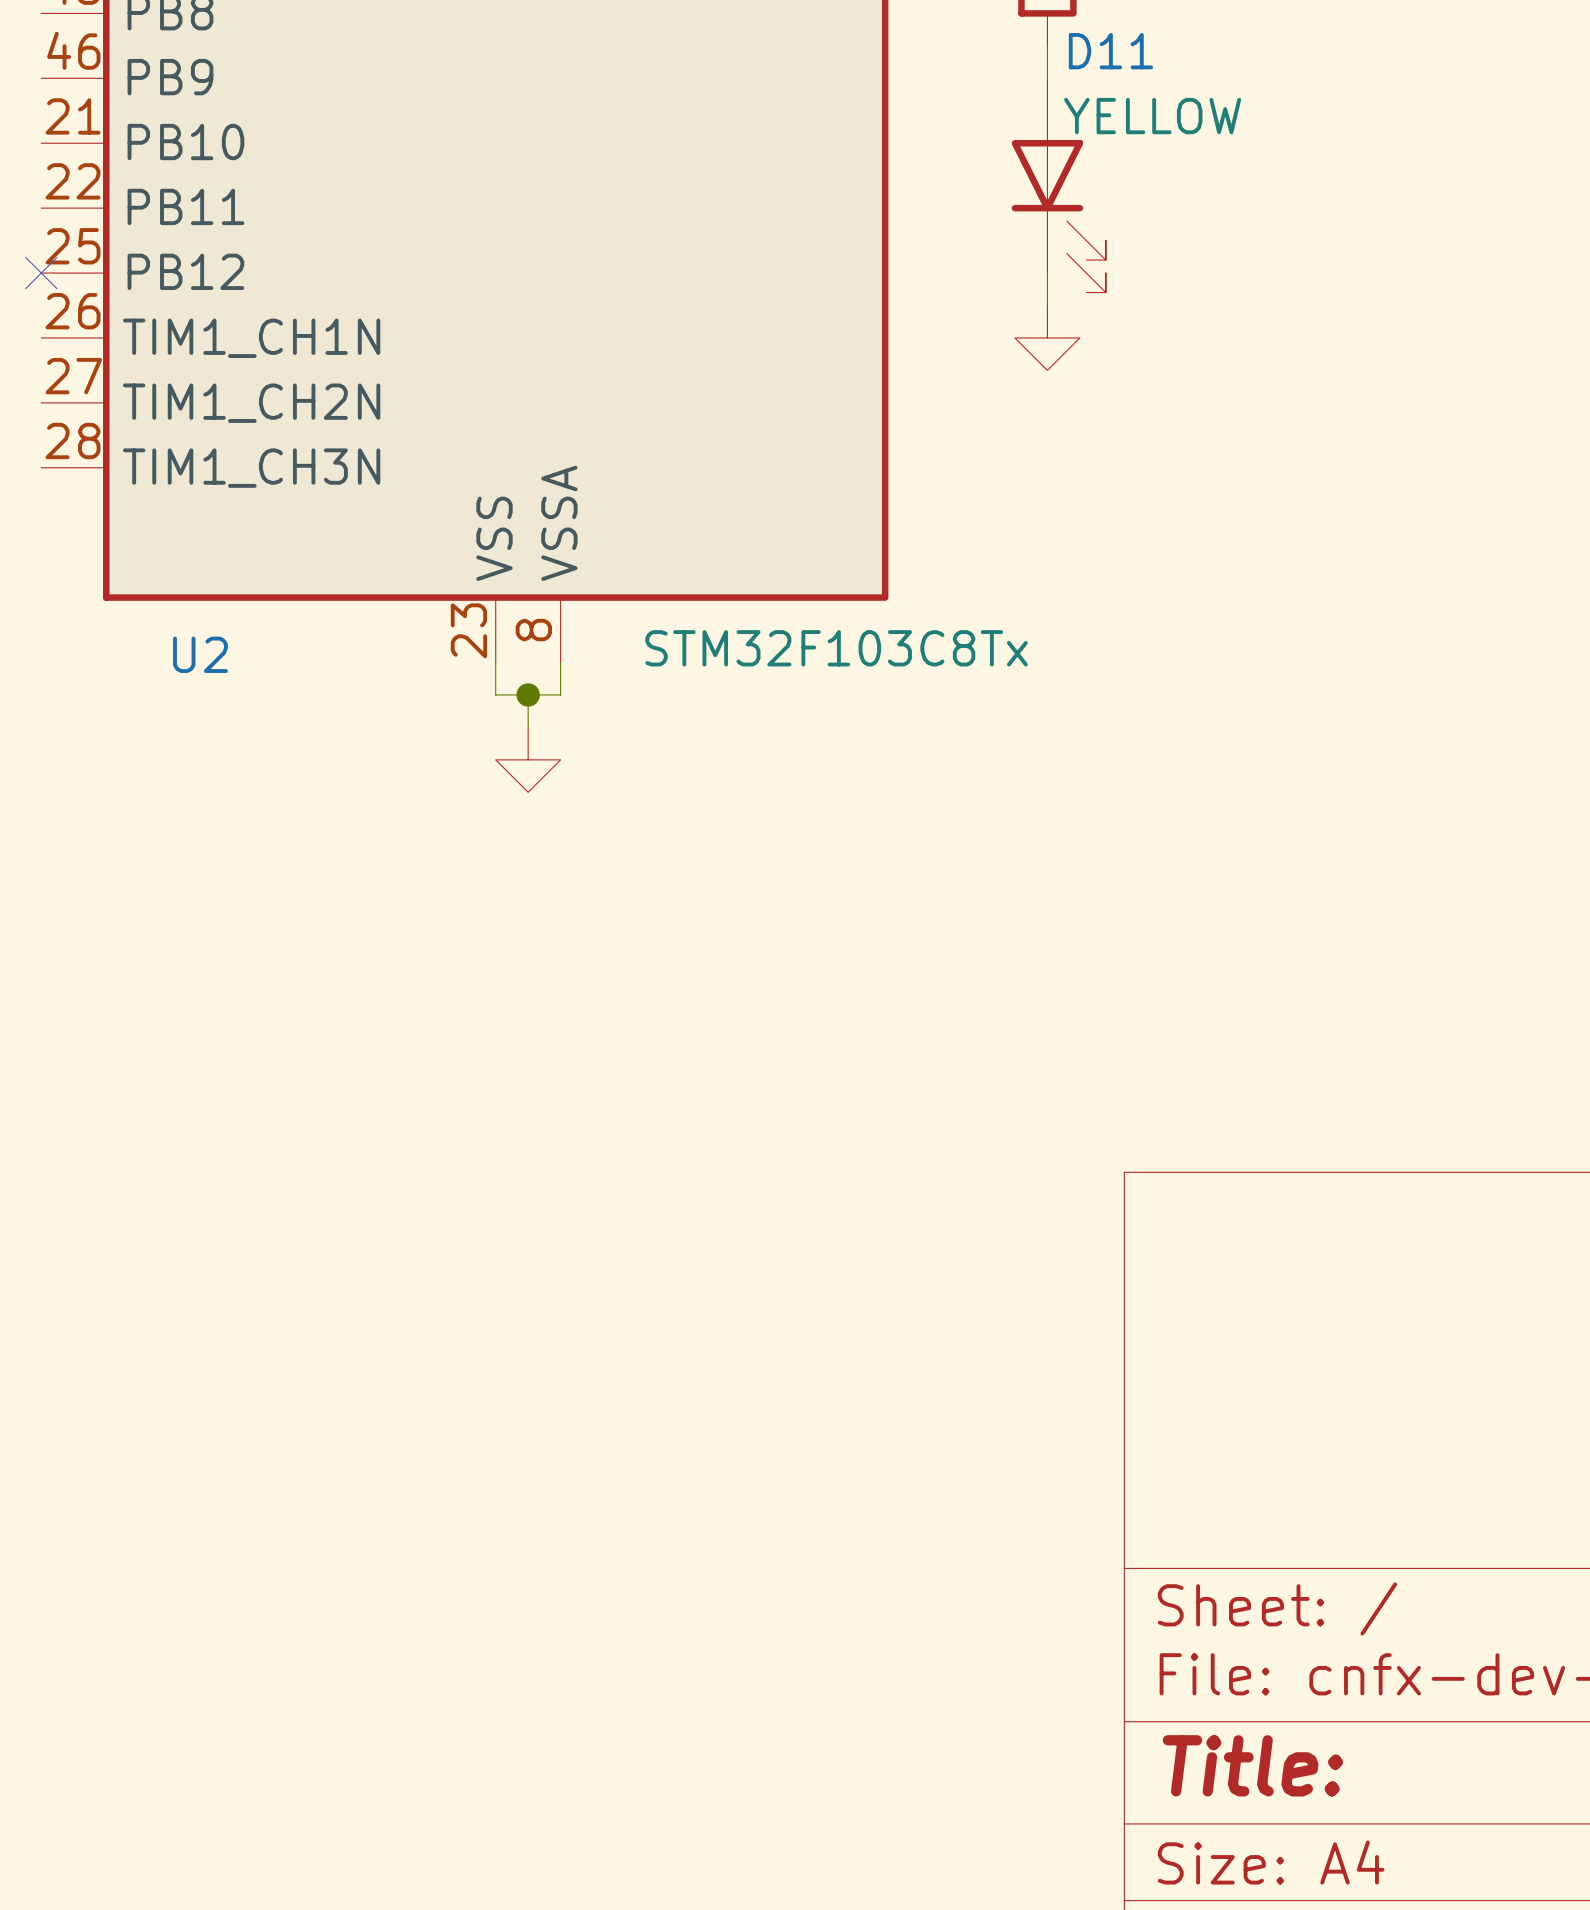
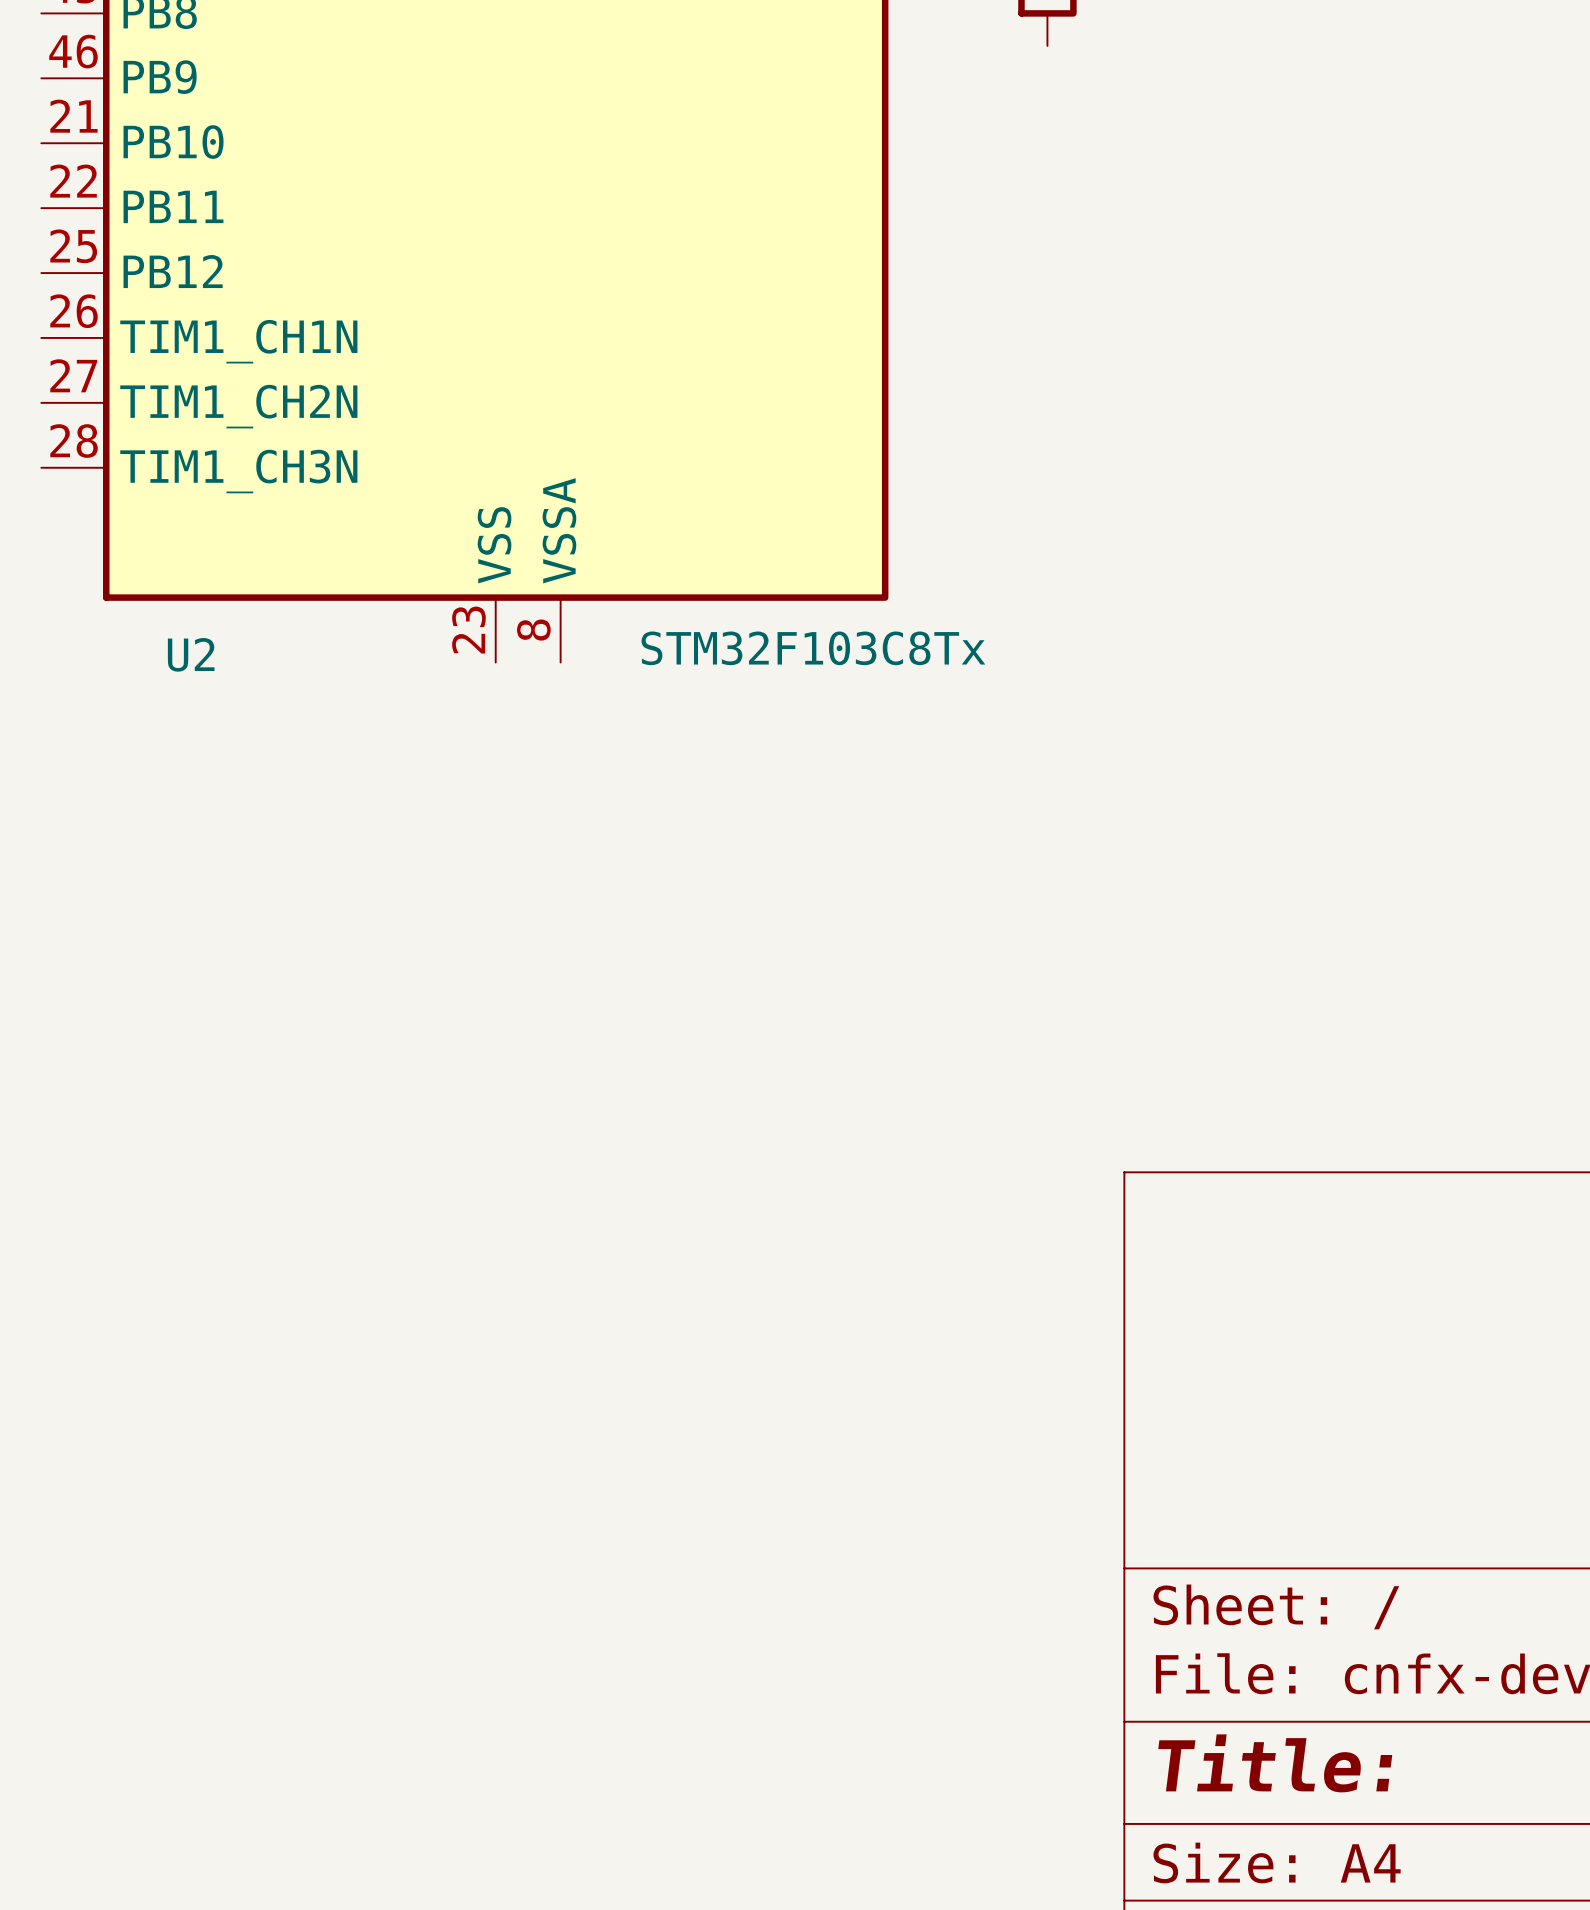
wire: (1047, 45) (1047, 78) -> none
D11: YELLOW (1058, 185) -> none
no-connect mark: (41, 273) -> none
wire: (1047, 273) (1047, 305) -> none
power symbol: (1047, 337) -> none
wire: (495, 662) (495, 694) (560, 694) (560, 662) -> none
wire: (528, 694) (528, 727) -> none
junction: (528, 694) -> none
power symbol: (528, 759) -> none

